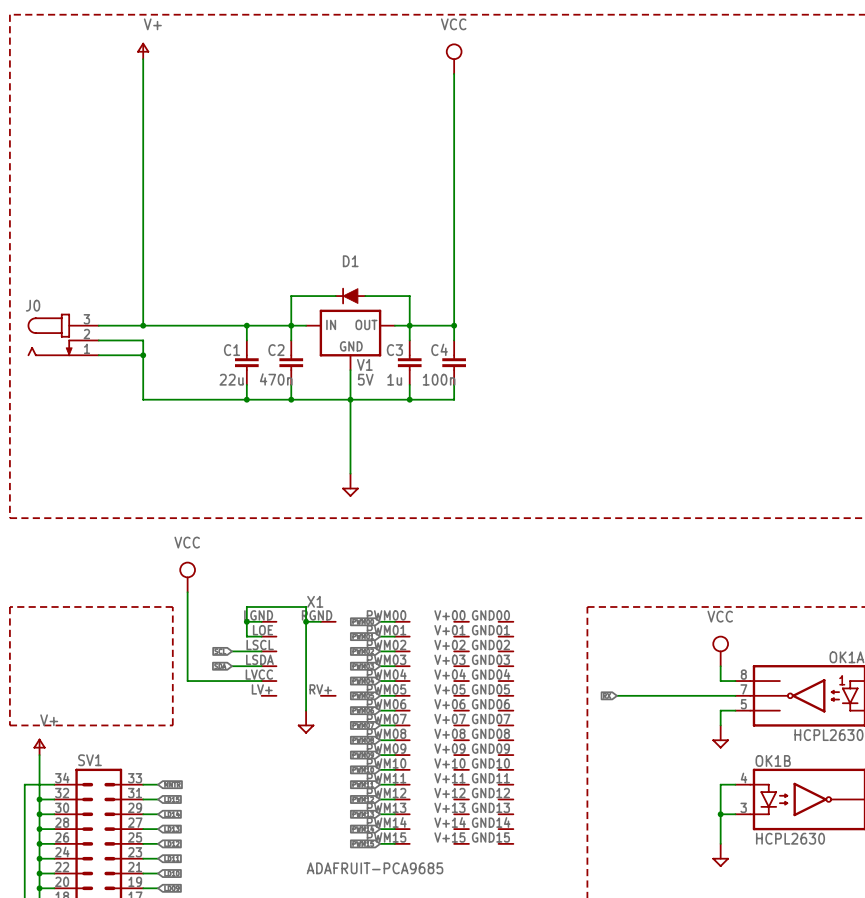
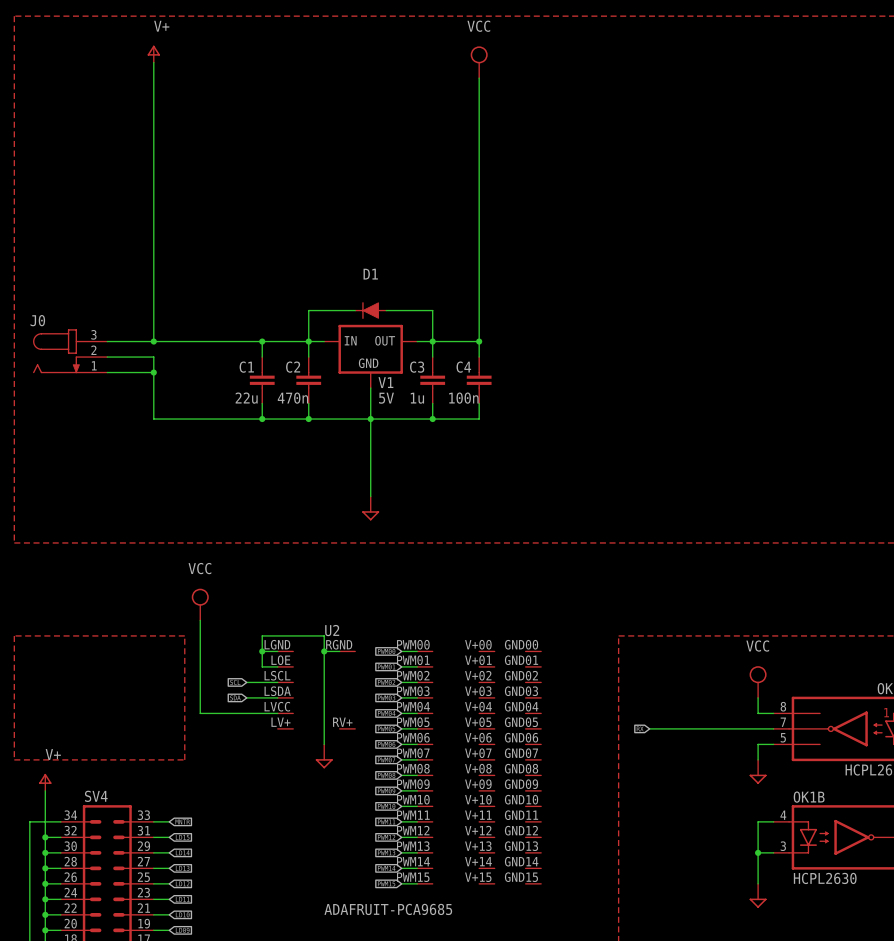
X1 name: X1 (315, 601) -> U2 (332, 630)
SV1 name: SV1 (89, 760) -> SV4 (96, 796)

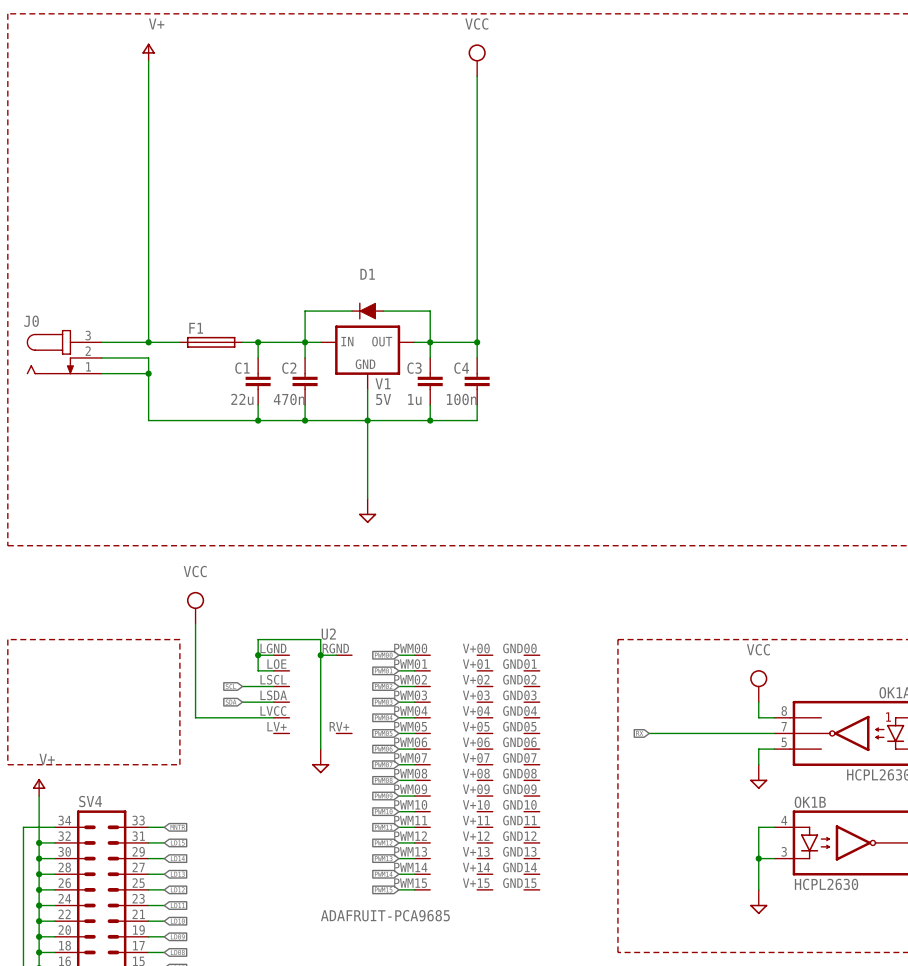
F1: none -> (211, 342)

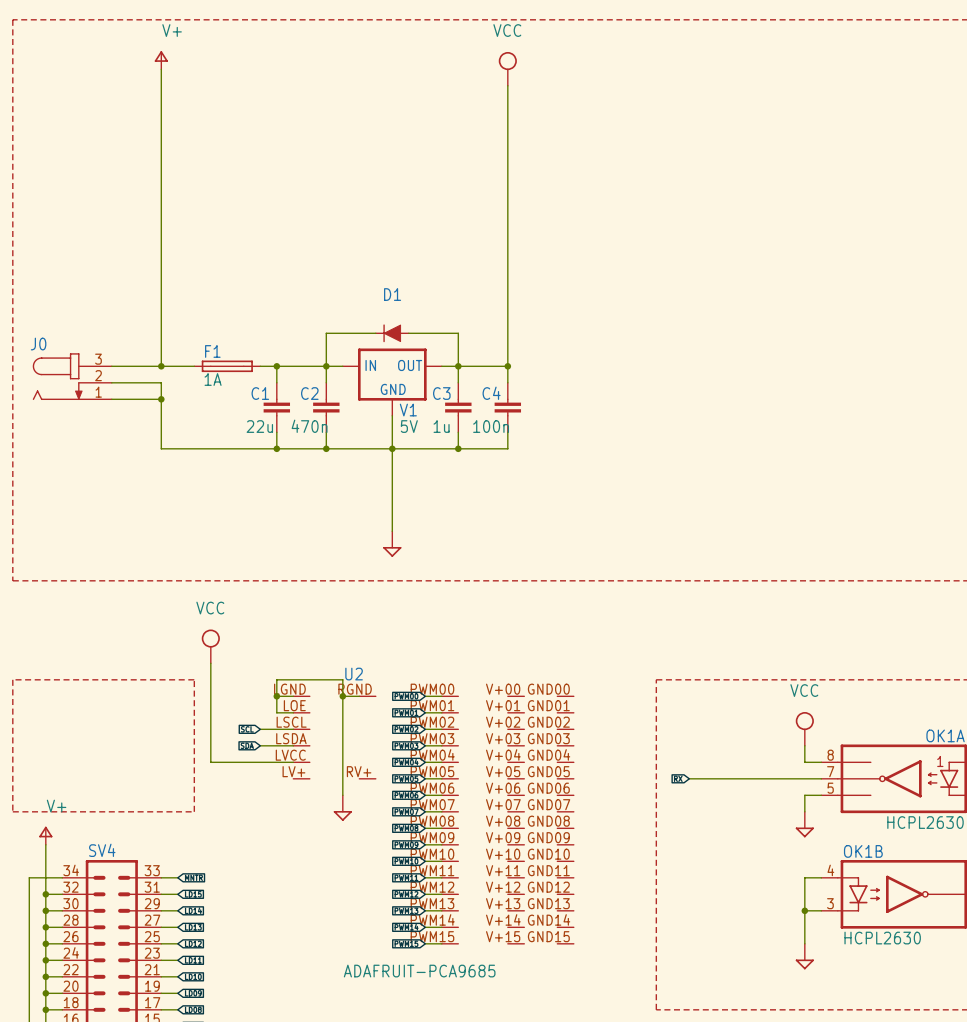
F1 value: none -> 1A (213, 379)

